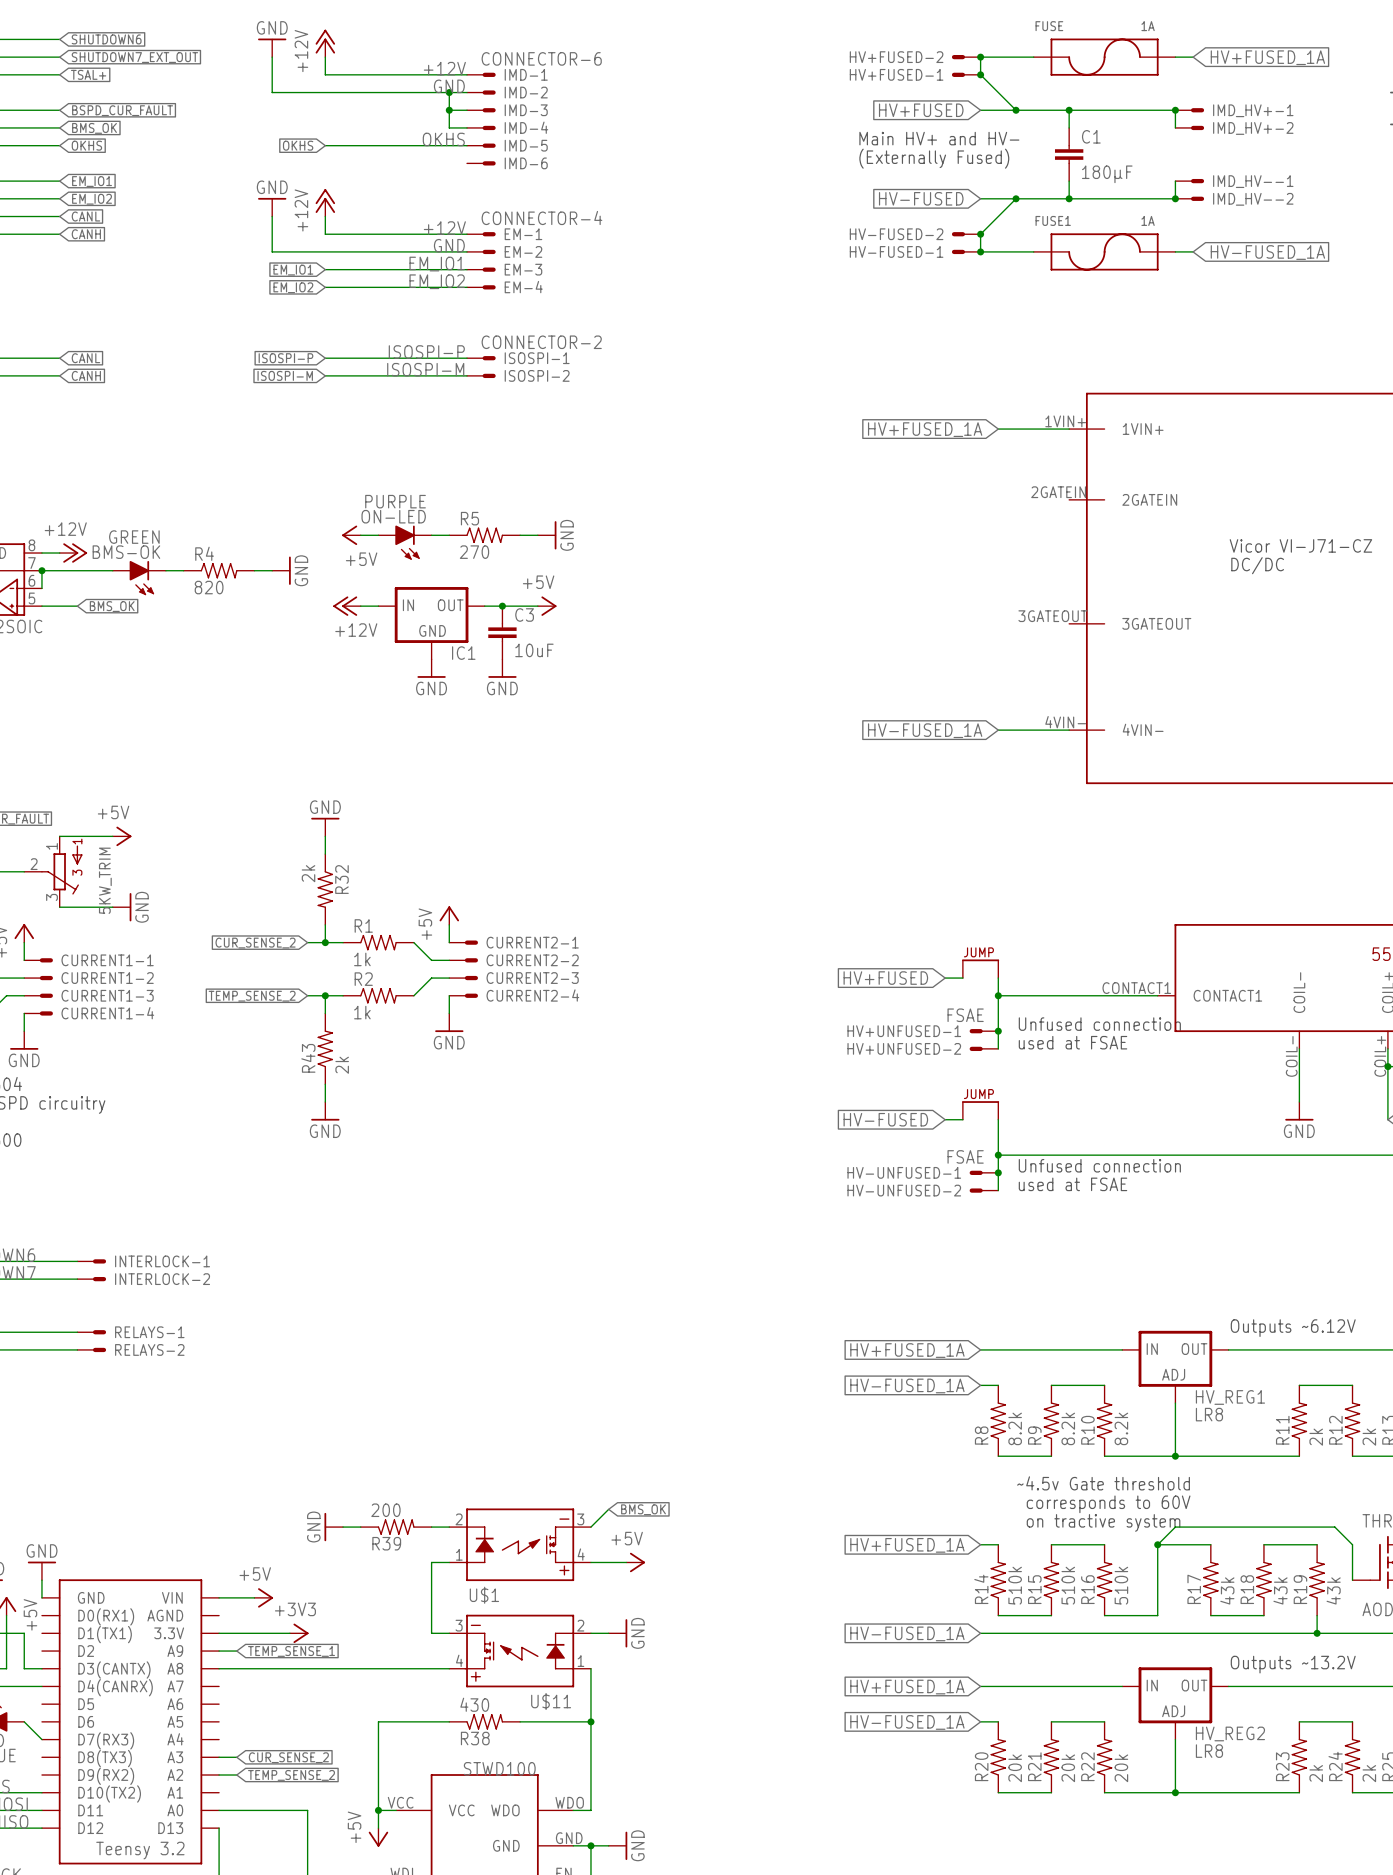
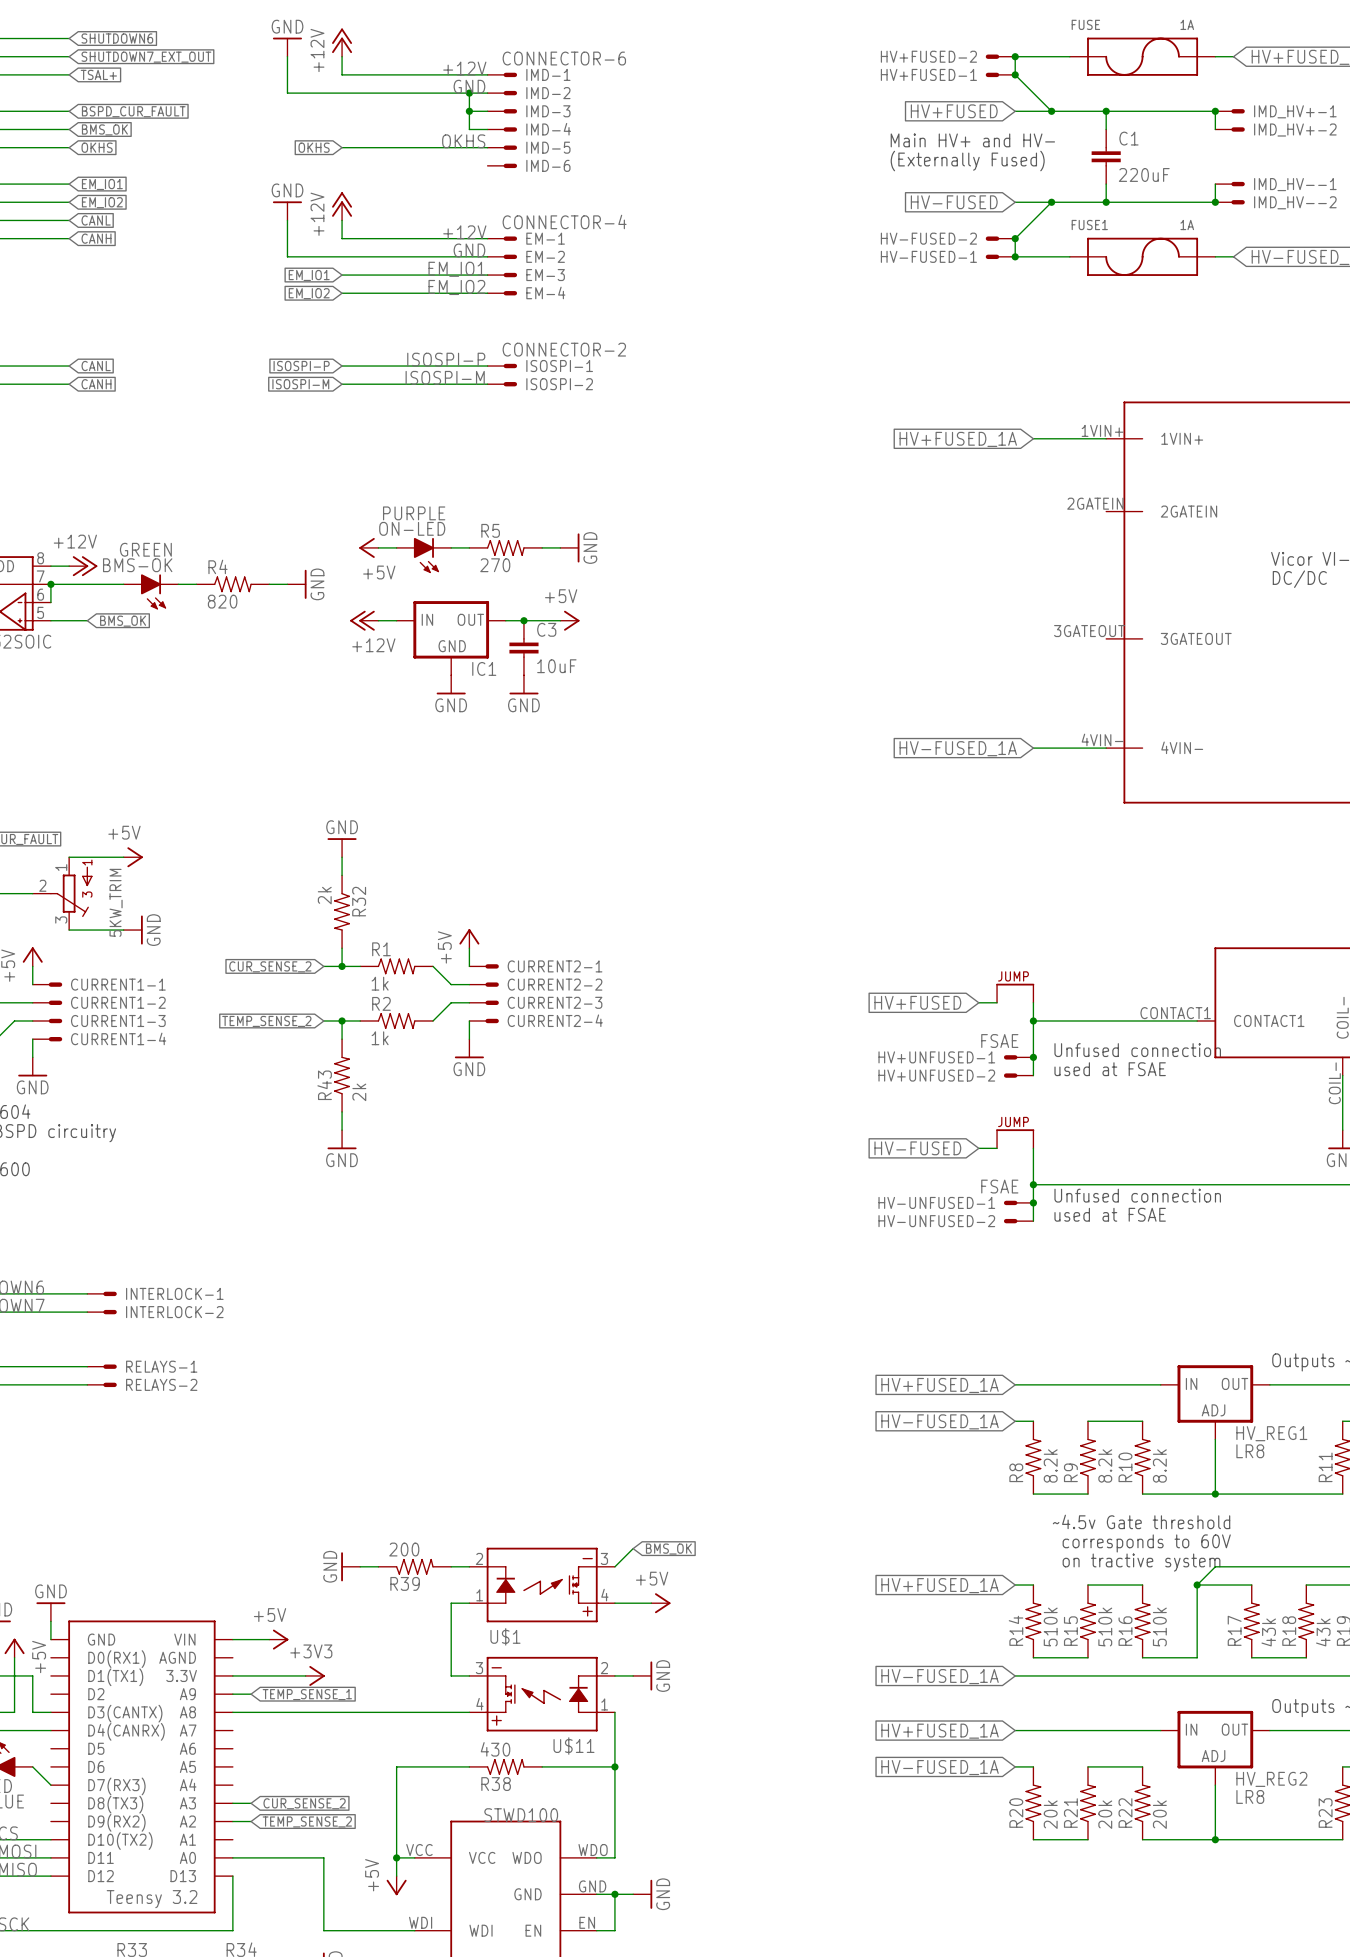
C1 value: 180µF (1107, 174) -> 220uF (1144, 174)

